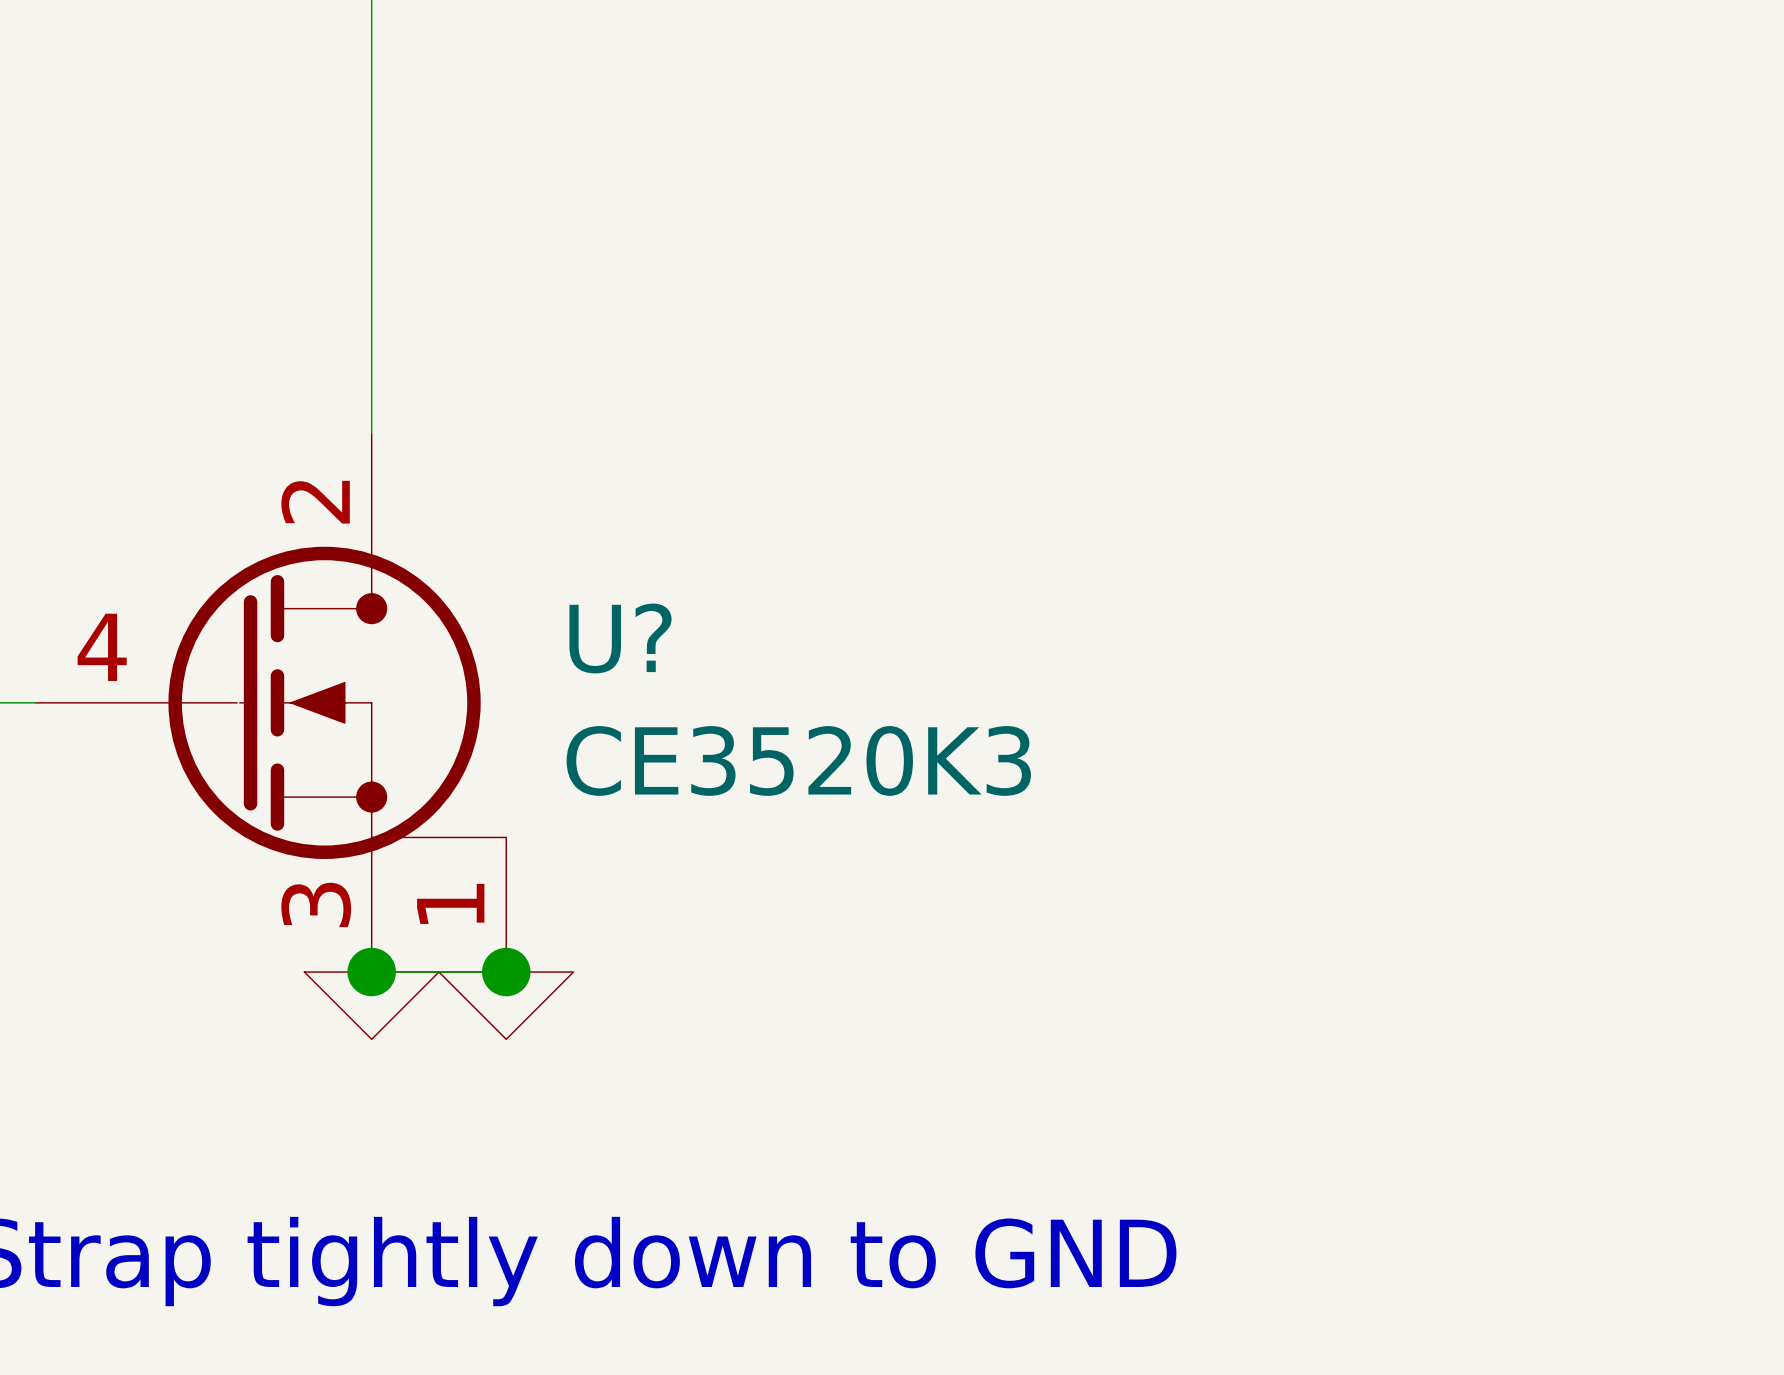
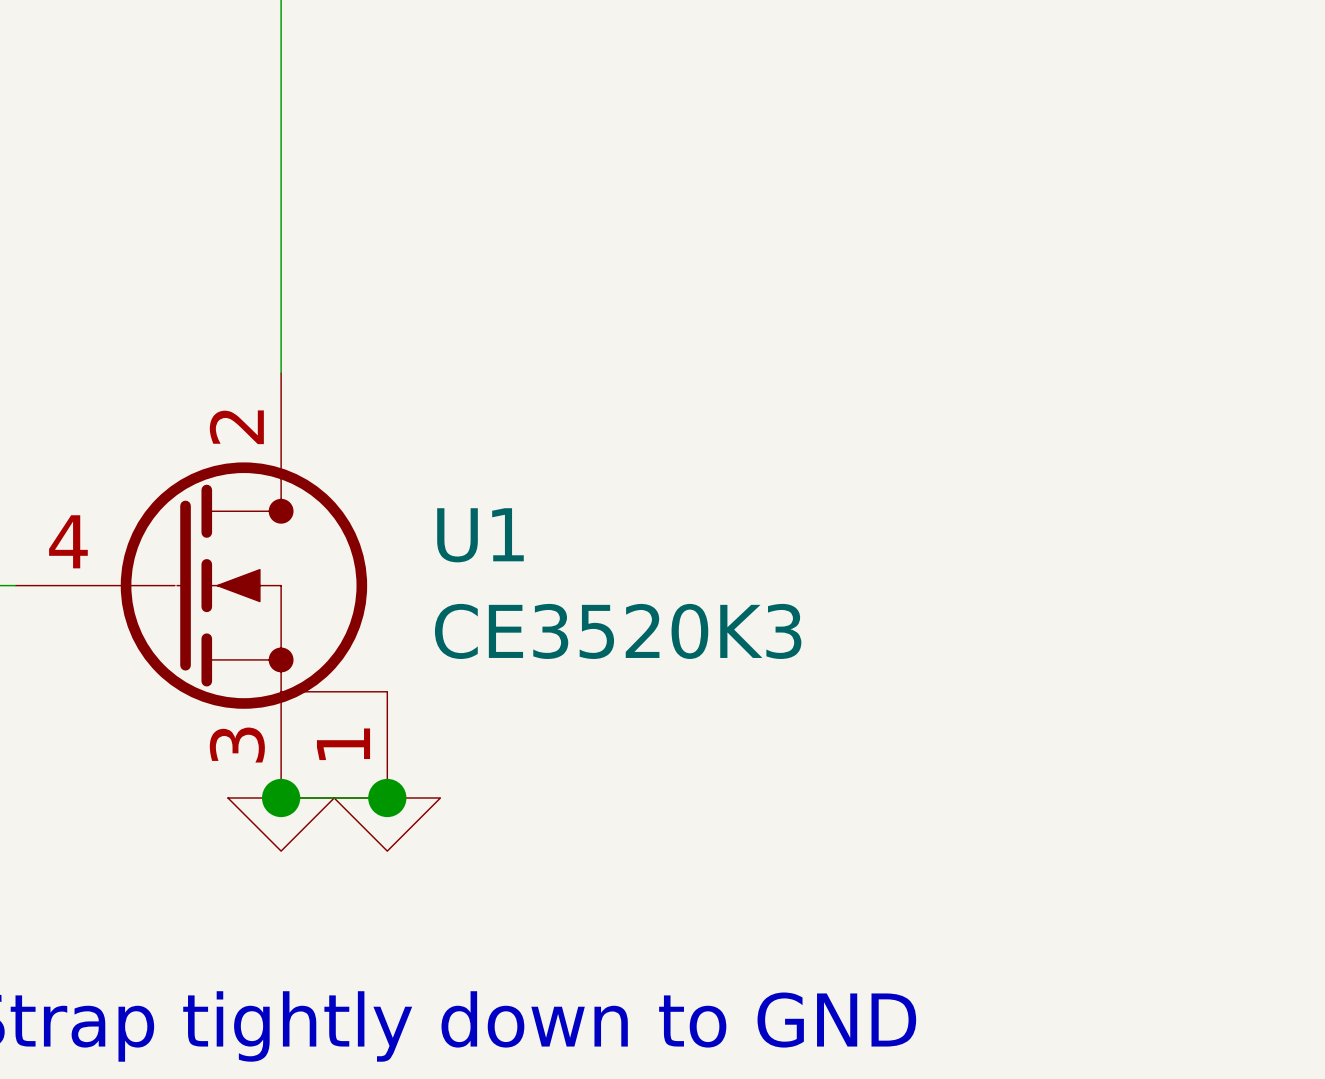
U? name: U? (620, 638) -> U1 (480, 535)

